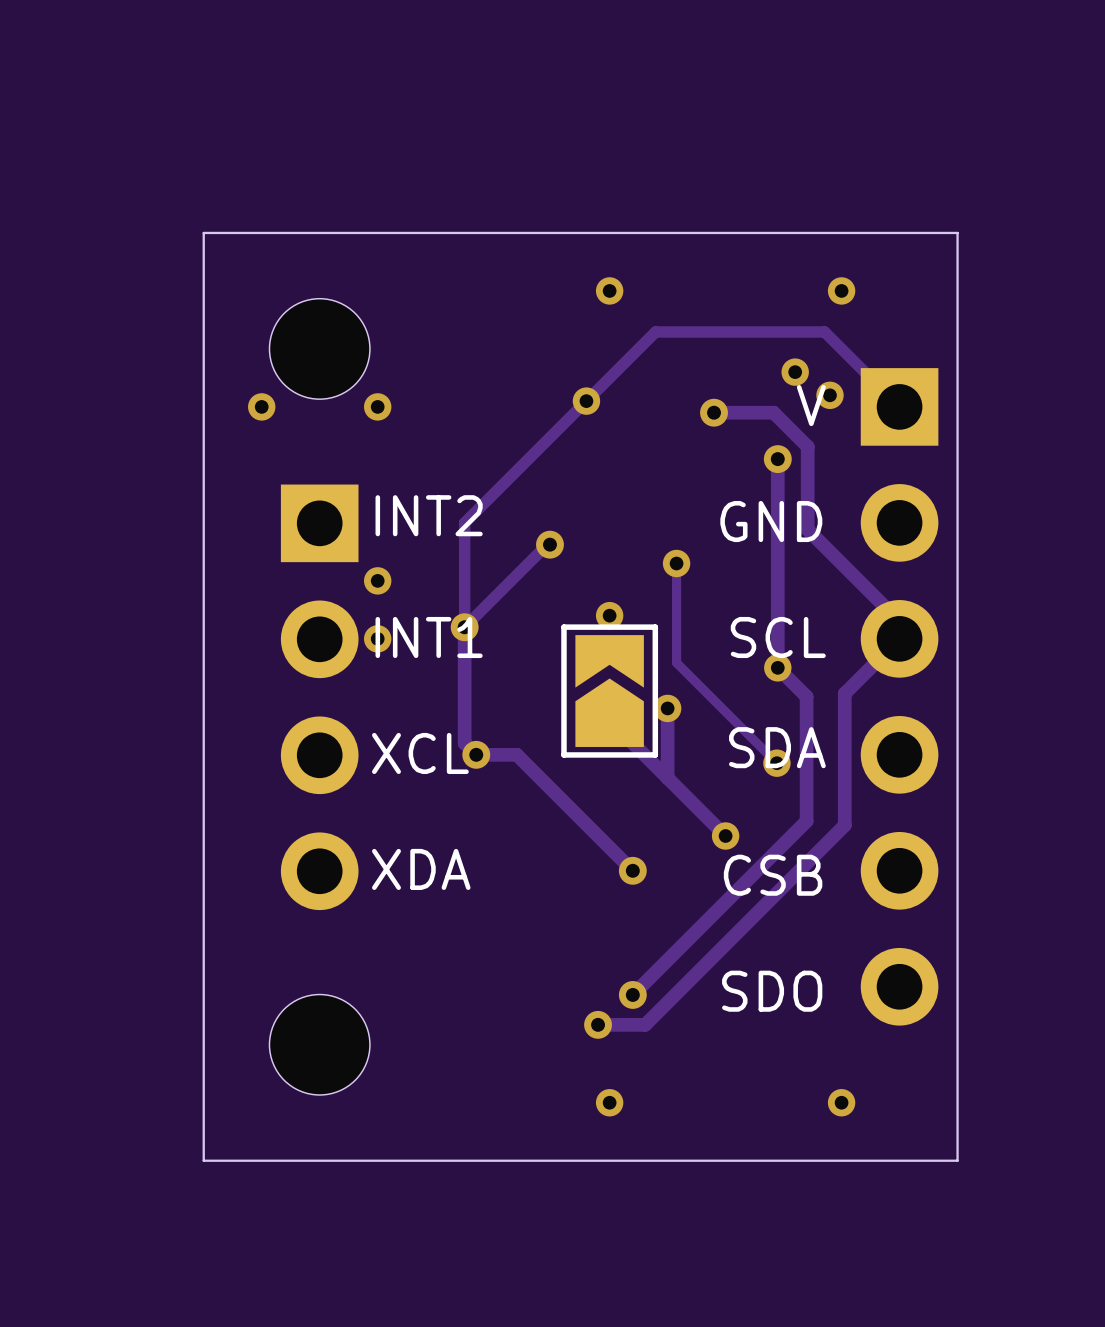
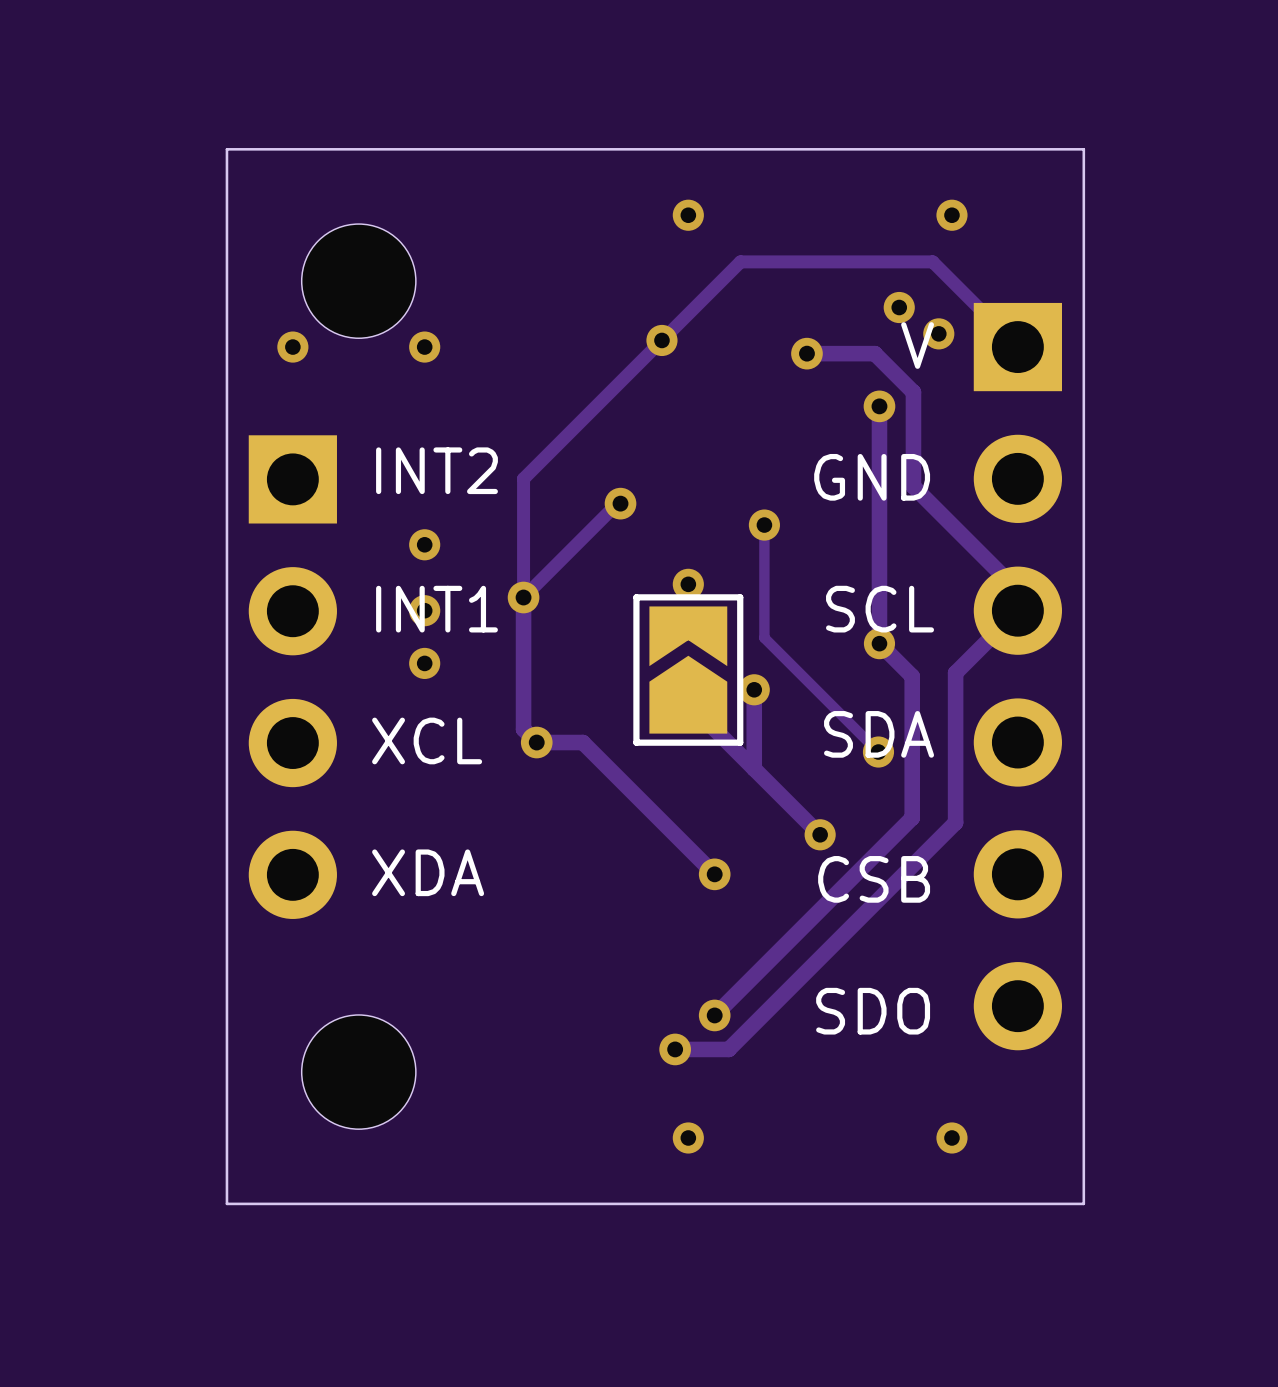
text position: INT2 (429, 515) -> INT2 (436, 470)
text position: INT1 (429, 637) -> INT1 (436, 609)
via: none -> (424, 663)
part position: (319, 697) -> (292, 677)
text position: XCL (420, 753) -> XCL (427, 740)
text position: XDA (421, 869) -> XDA (428, 872)

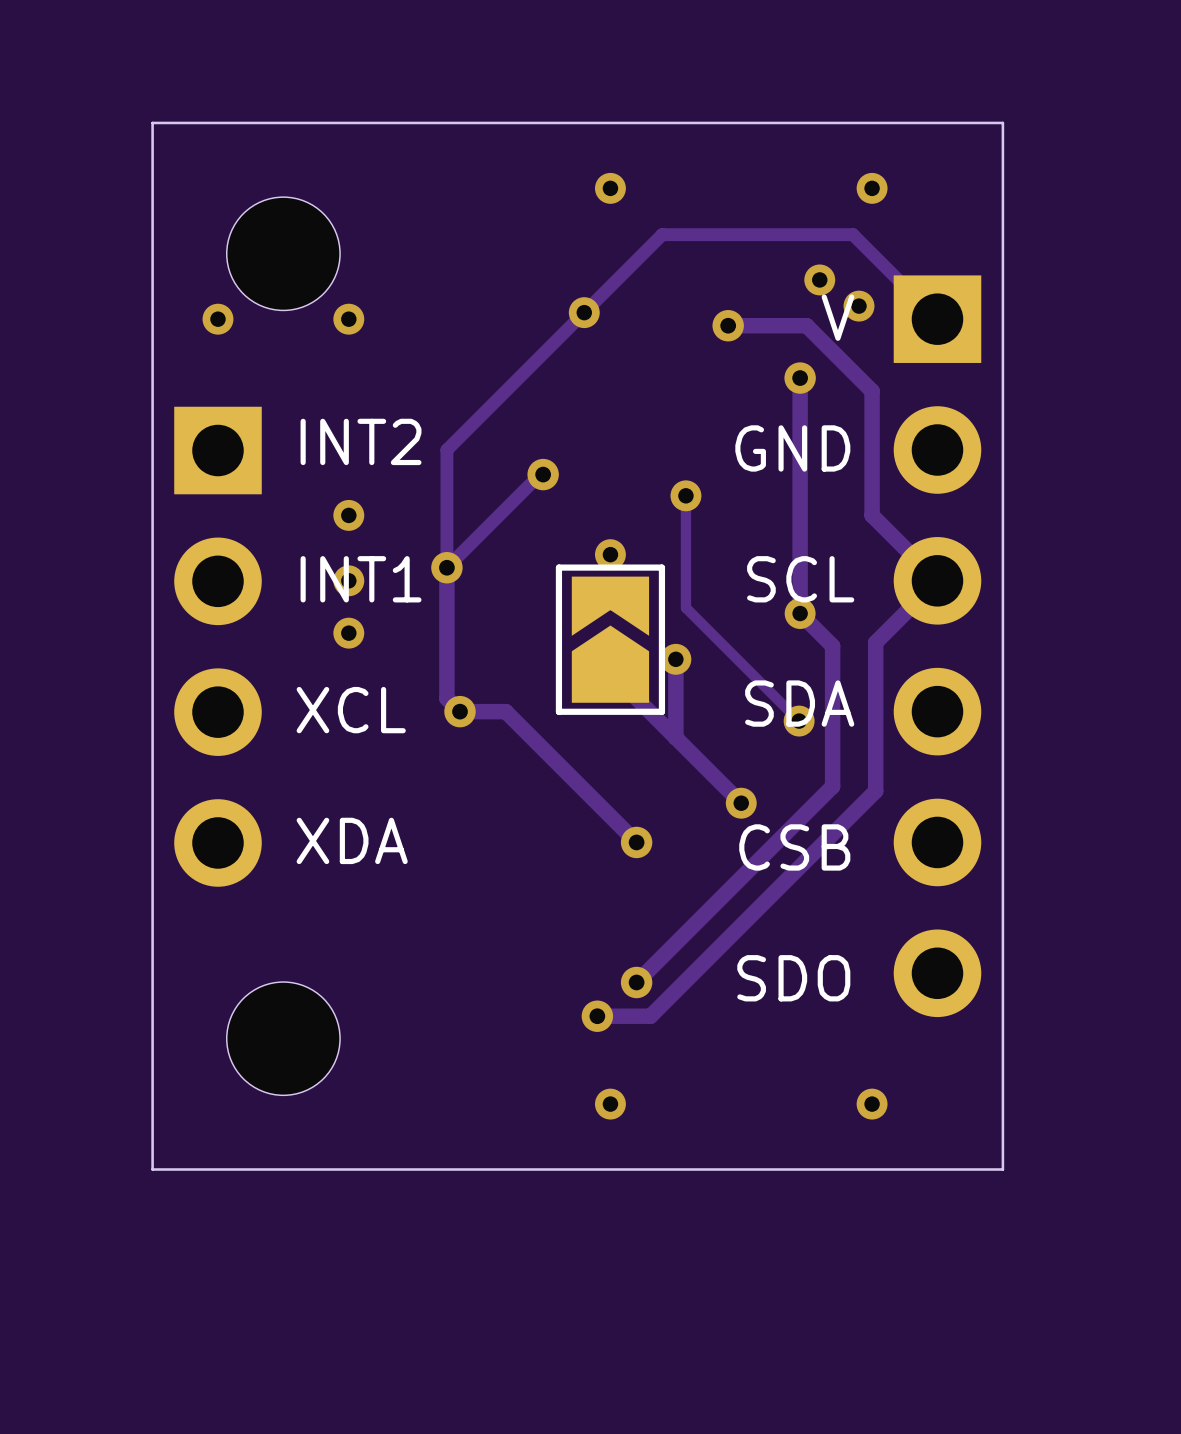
track: (874, 353) (913, 392) (913, 486) (1017, 590) (1017, 610) -> (795, 325) (806, 325) (872, 391) (872, 515) (937, 580)

